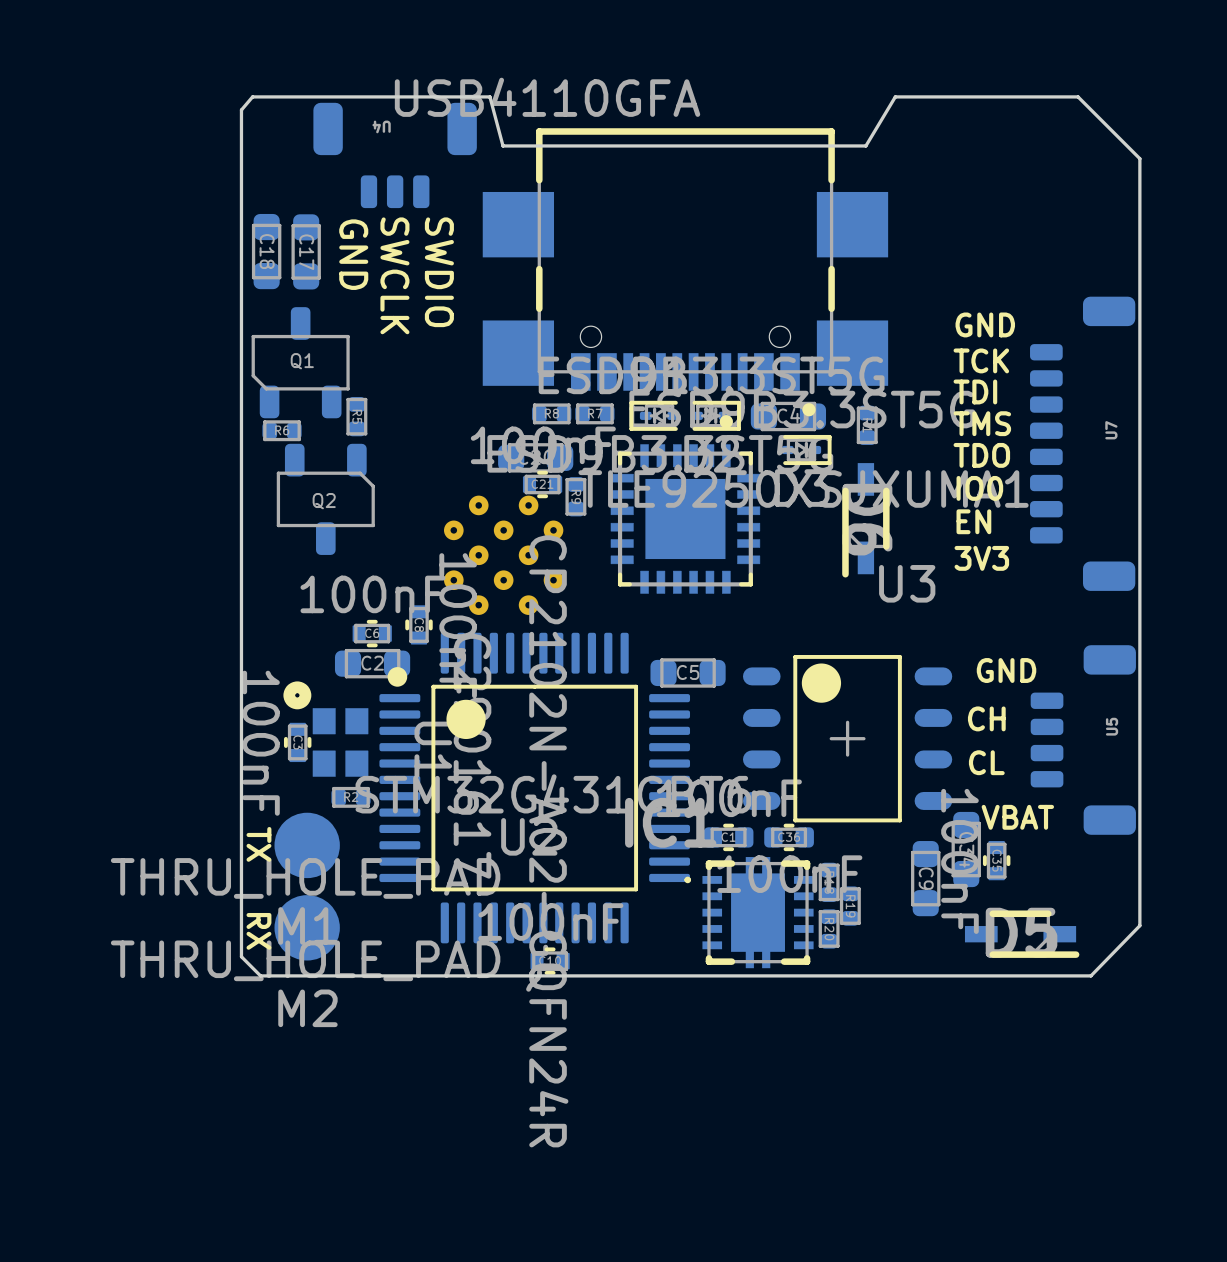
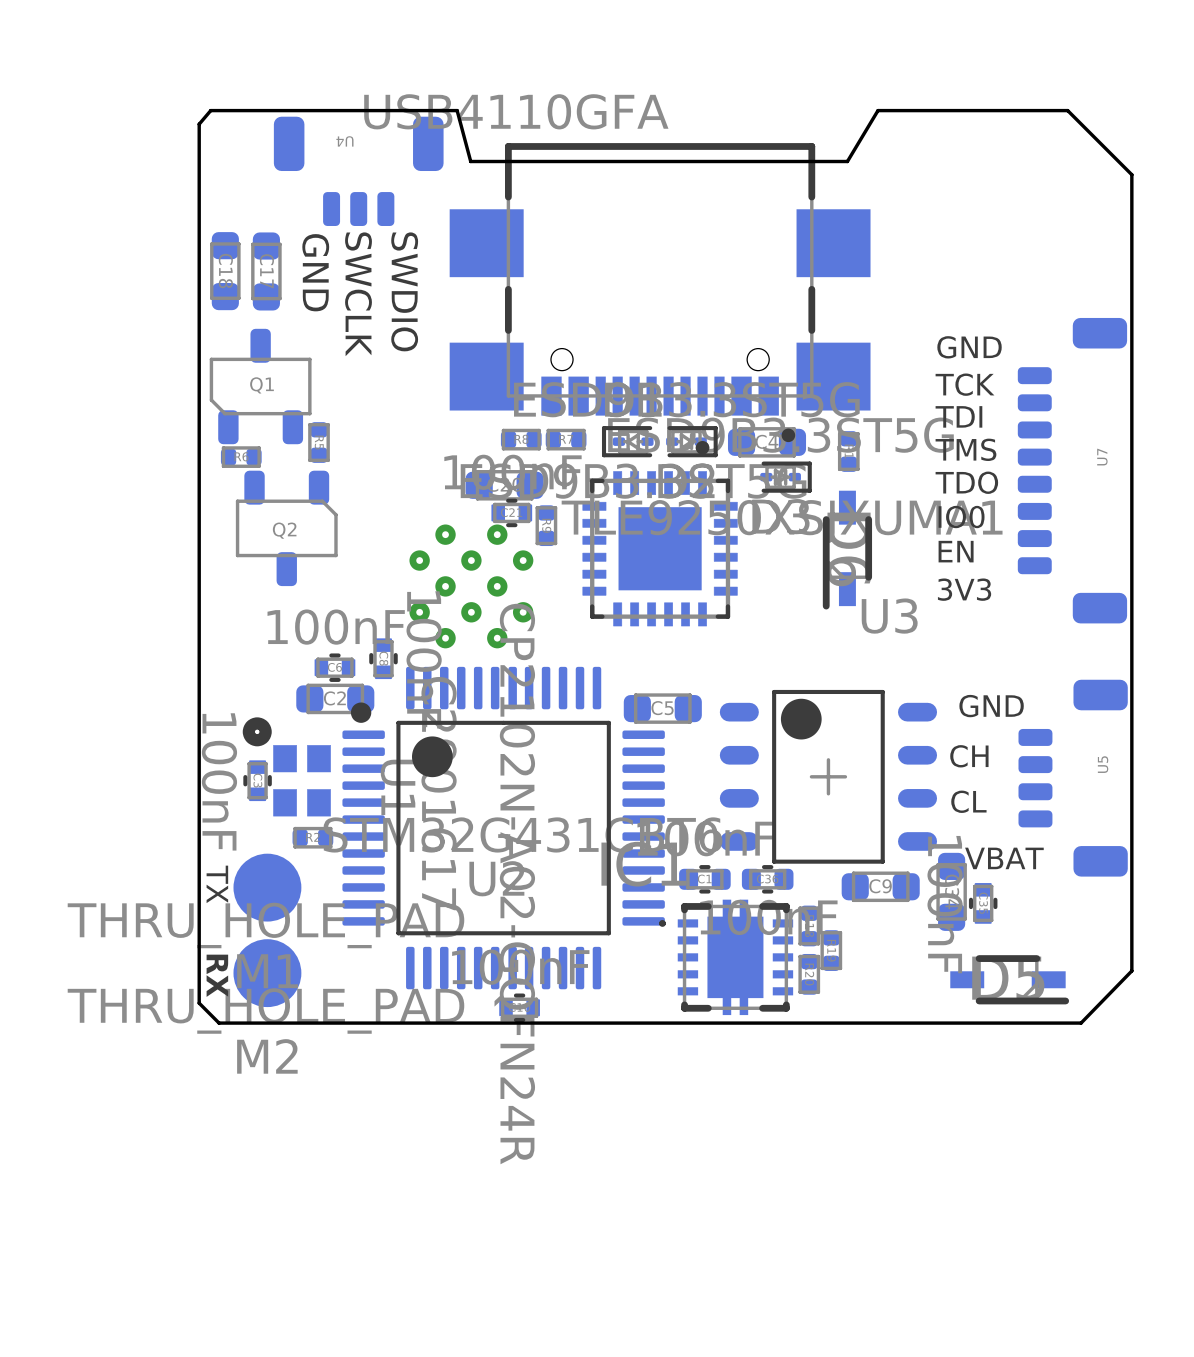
C9 rotation: 0° (925, 878) -> 90° clockwise (880, 886)

